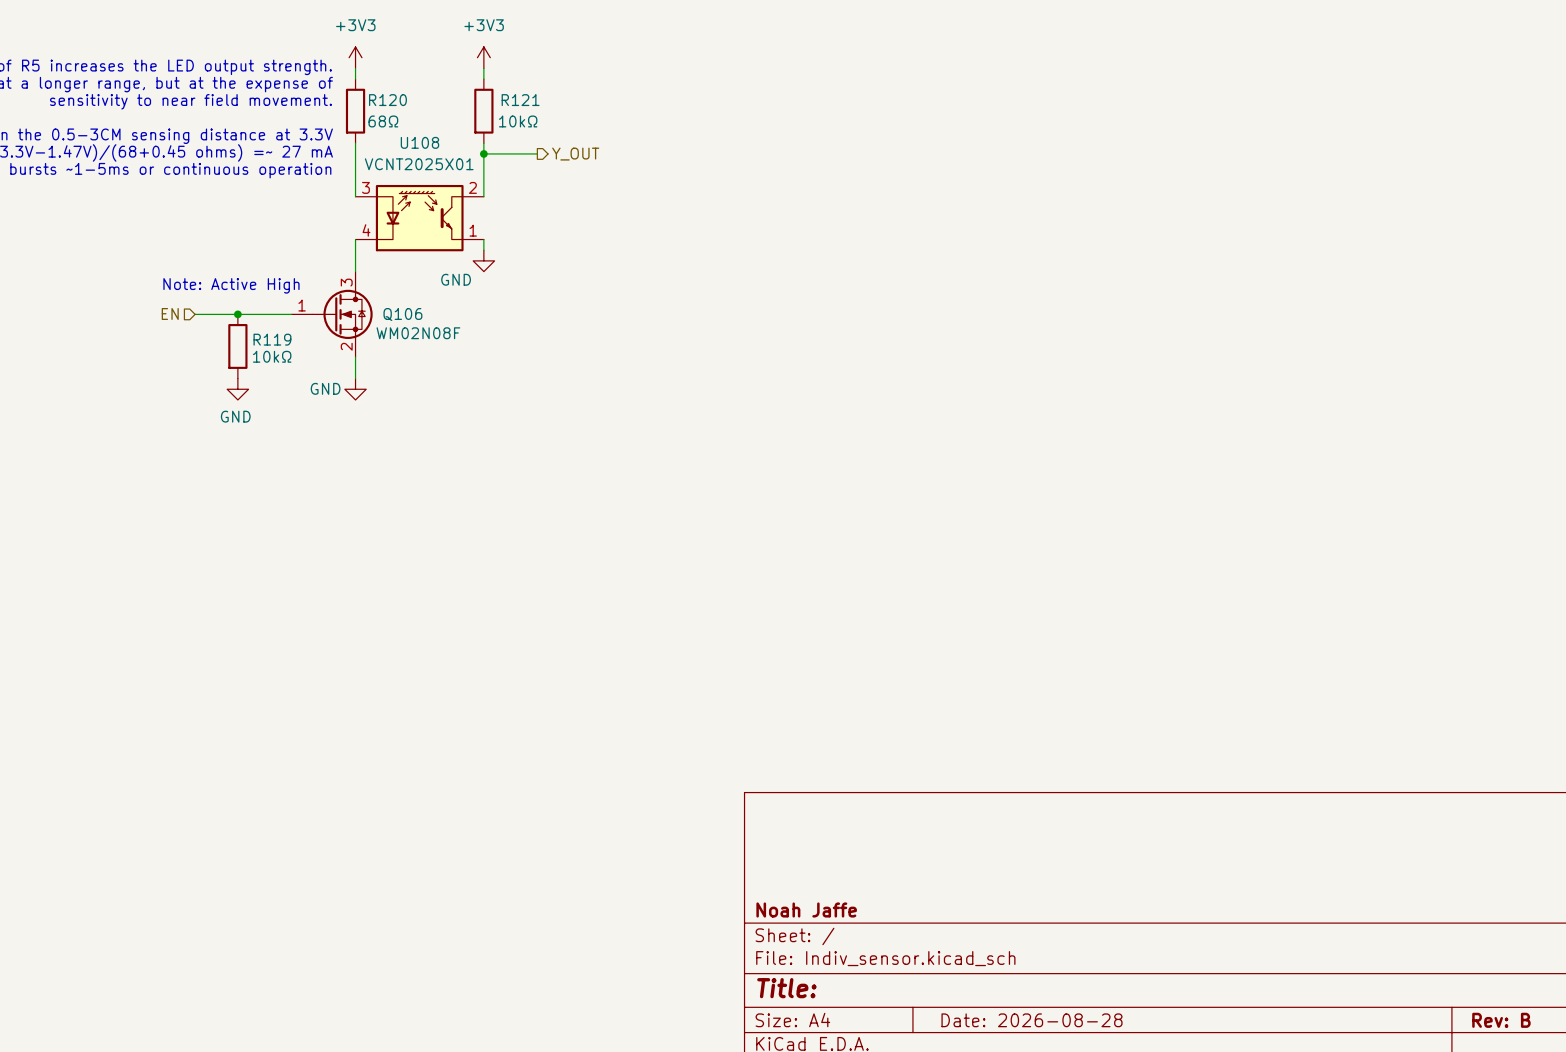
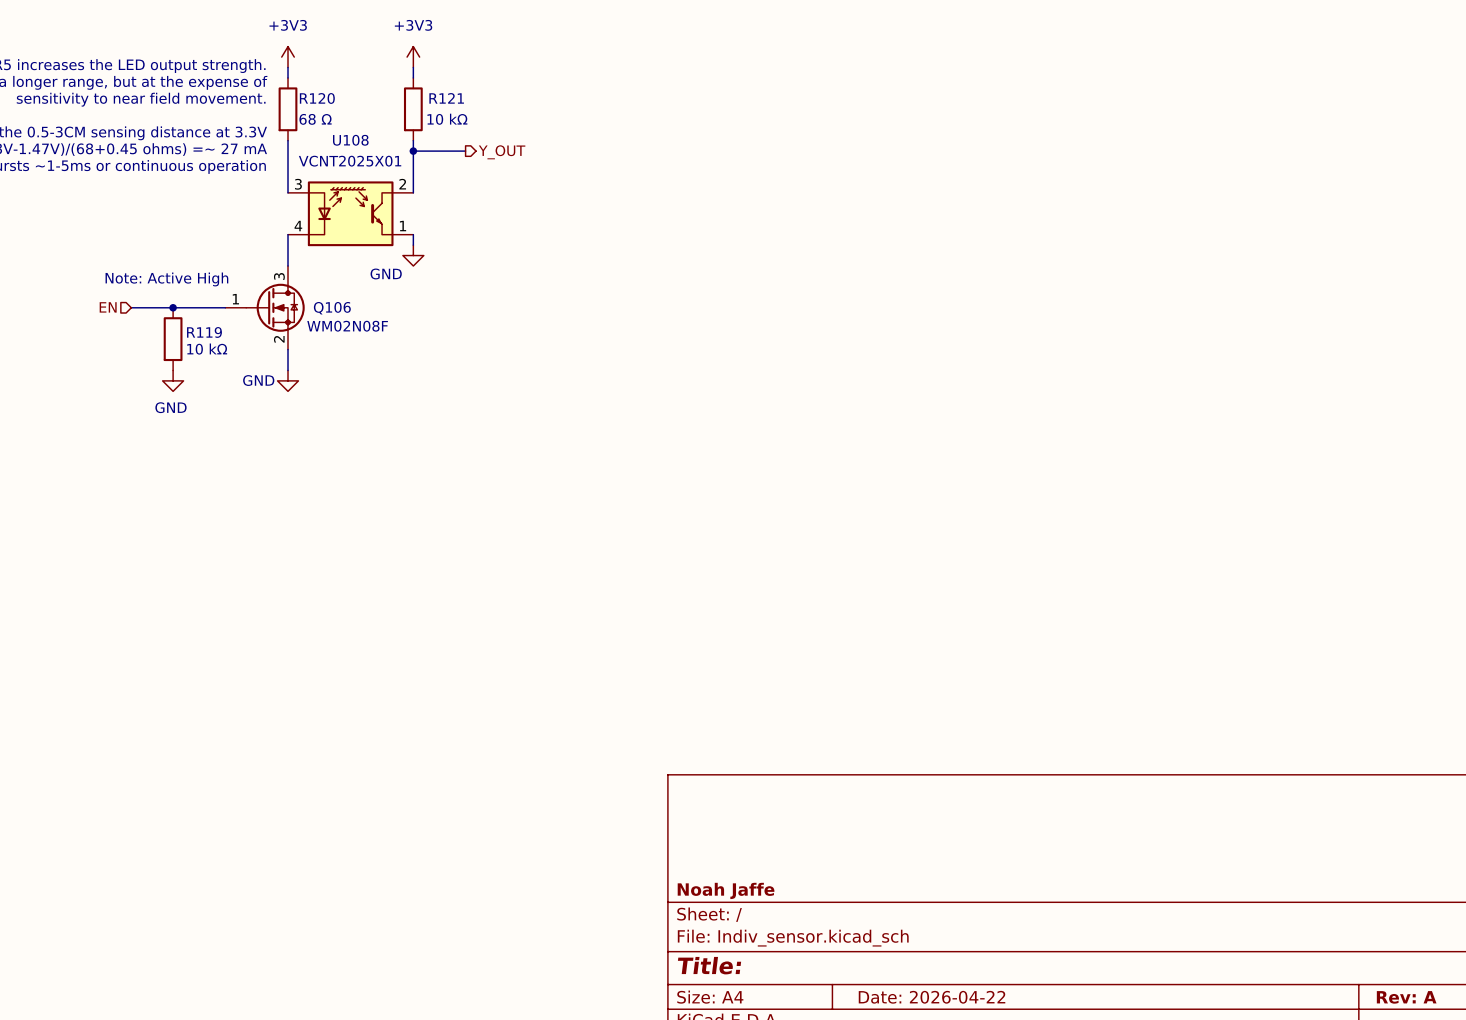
R120 value: 68Ω (383, 121) -> 68 Ω (315, 119)
R121 value: 10kΩ (518, 121) -> 10 kΩ (447, 119)
R119 value: 10kΩ (272, 356) -> 10 kΩ (207, 349)
title block: Date: 2026-08-28 (1032, 1020) -> Date: 2026-04-22 (932, 997)
title block: Rev: B (1501, 1020) -> Rev: A (1406, 997)

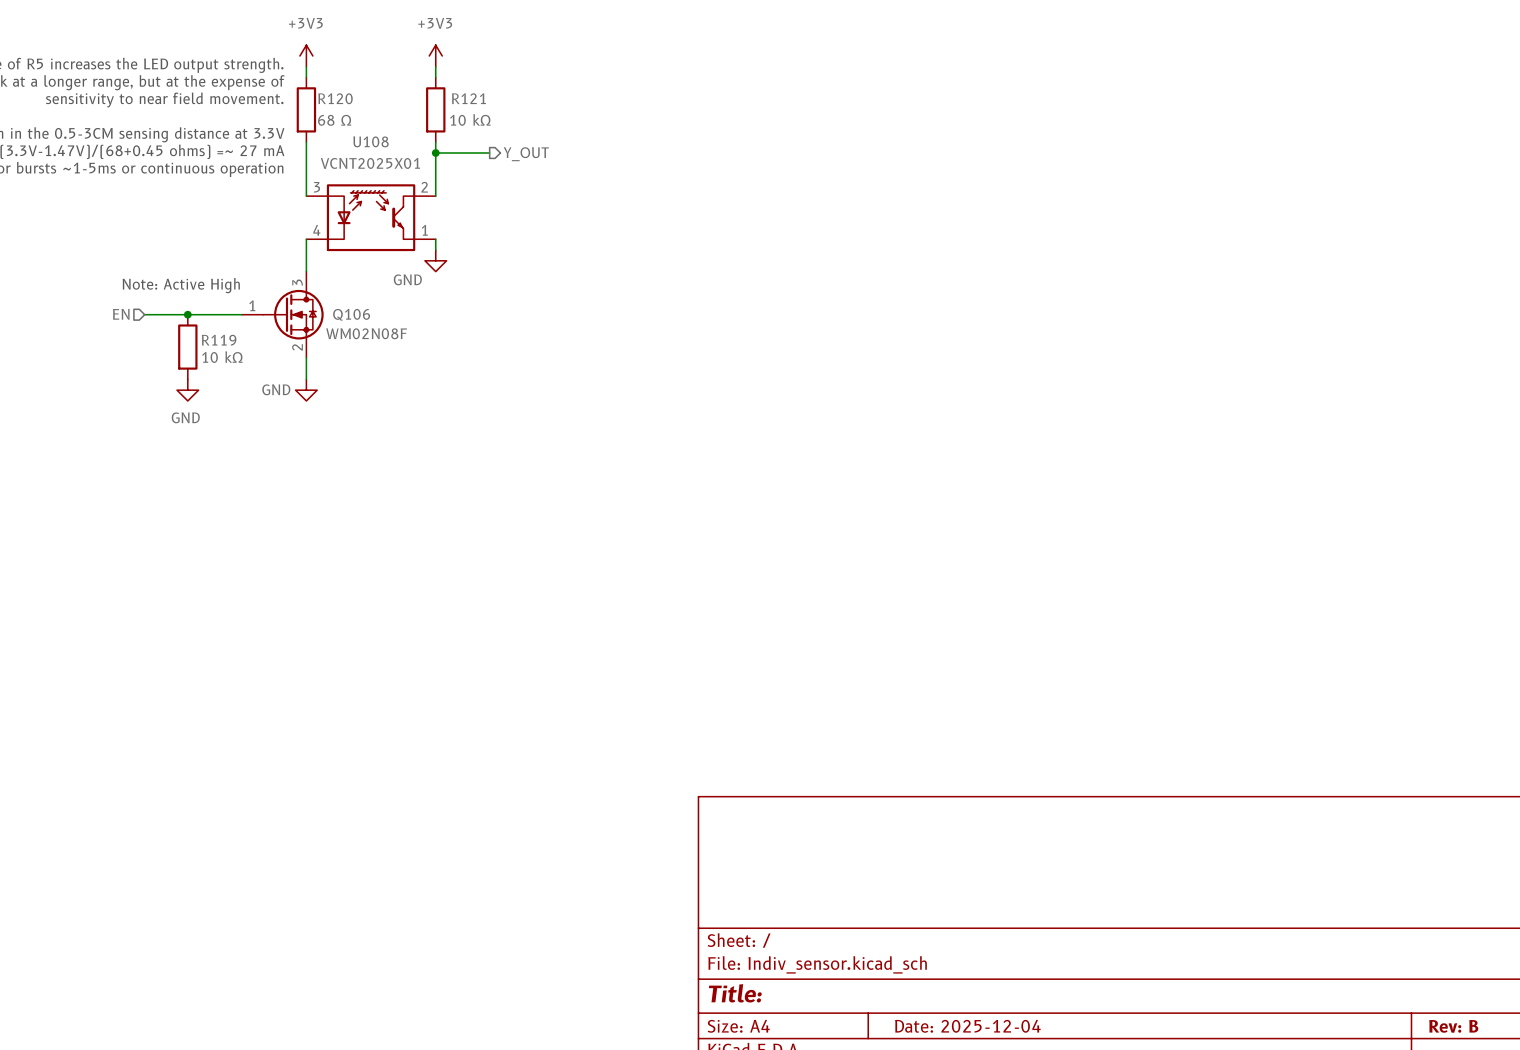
title block: Noah Jaffe (726, 890) -> none
title block: Date: 2026-04-22 (932, 997) -> Date: 2025-12-04 (967, 1026)
title block: Rev: A (1406, 997) -> Rev: B (1453, 1026)

